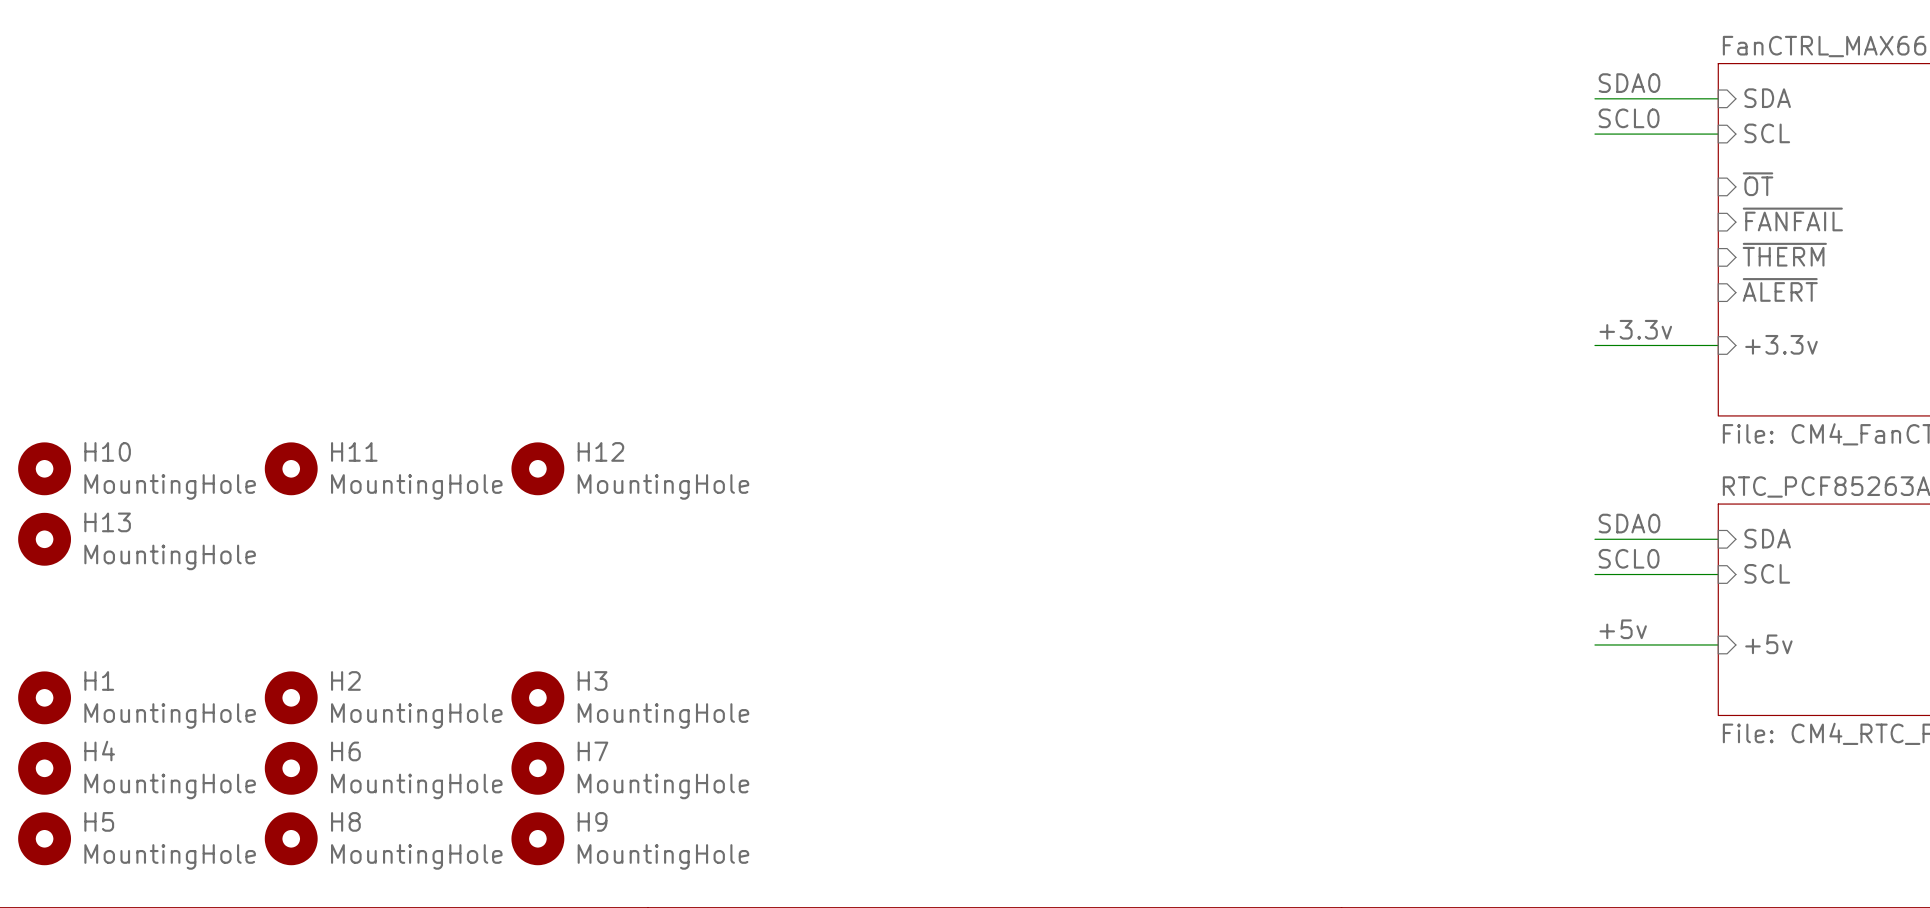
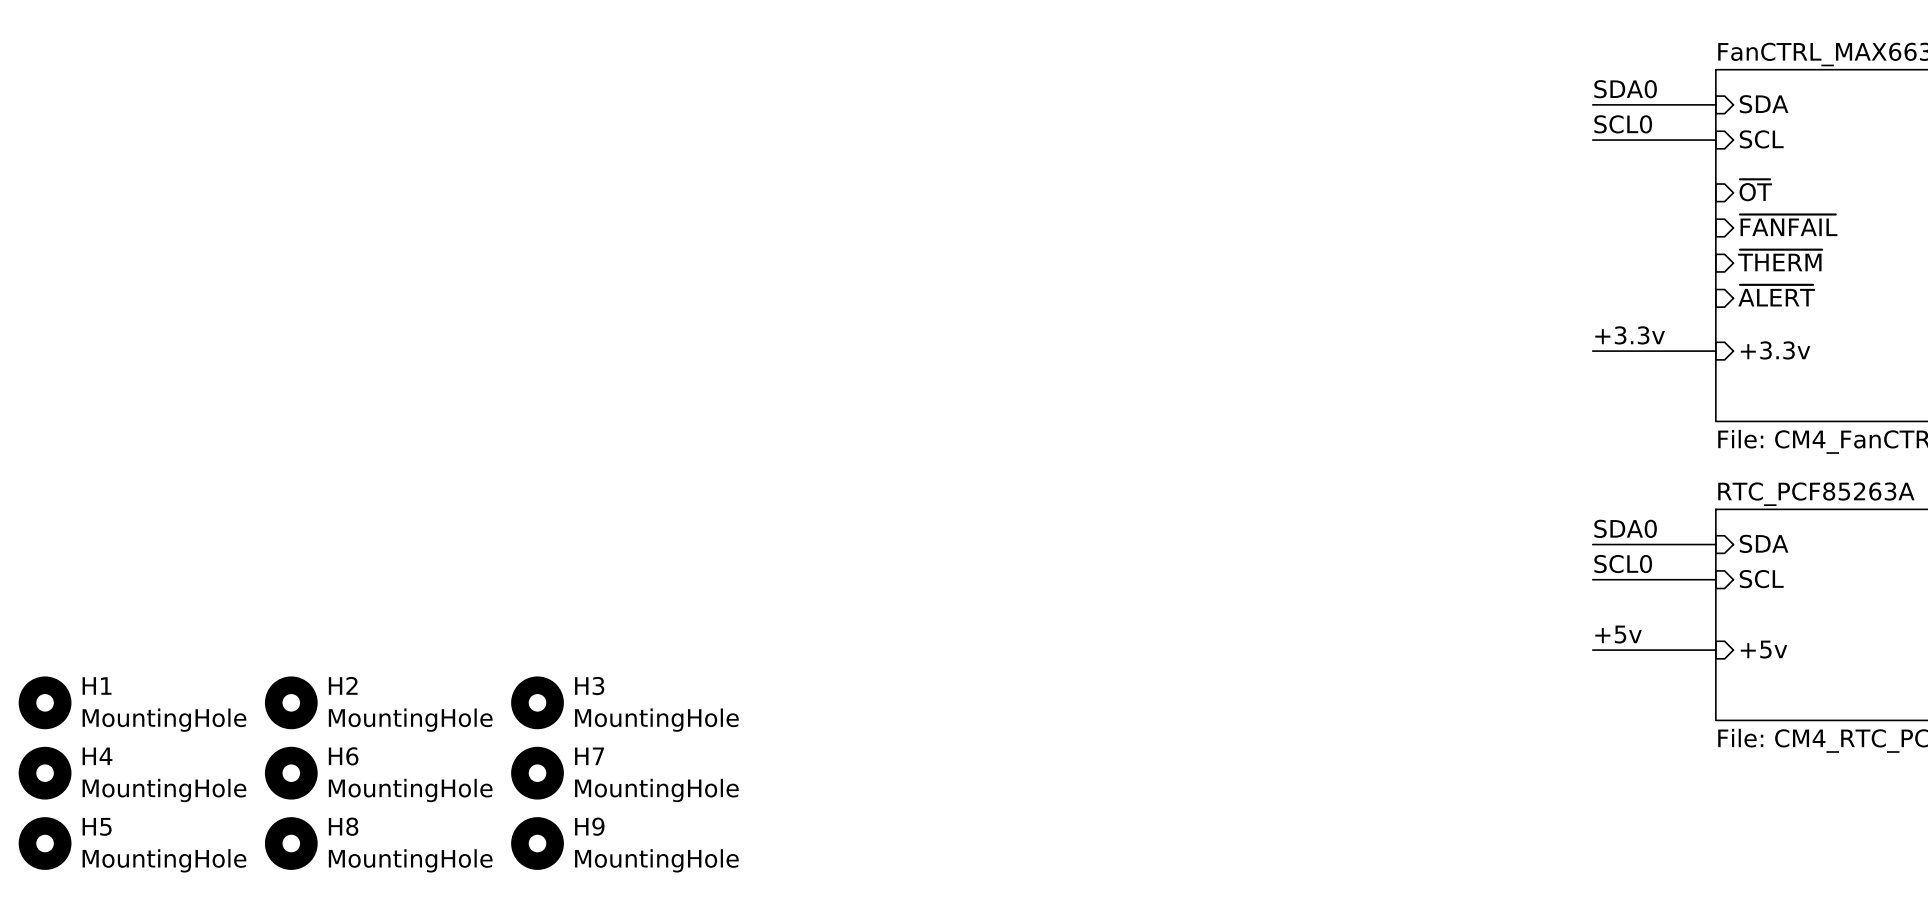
H10: MountingHole (44, 468) -> none
H11: MountingHole (291, 468) -> none
H12: MountingHole (537, 468) -> none
H13: MountingHole (44, 539) -> none

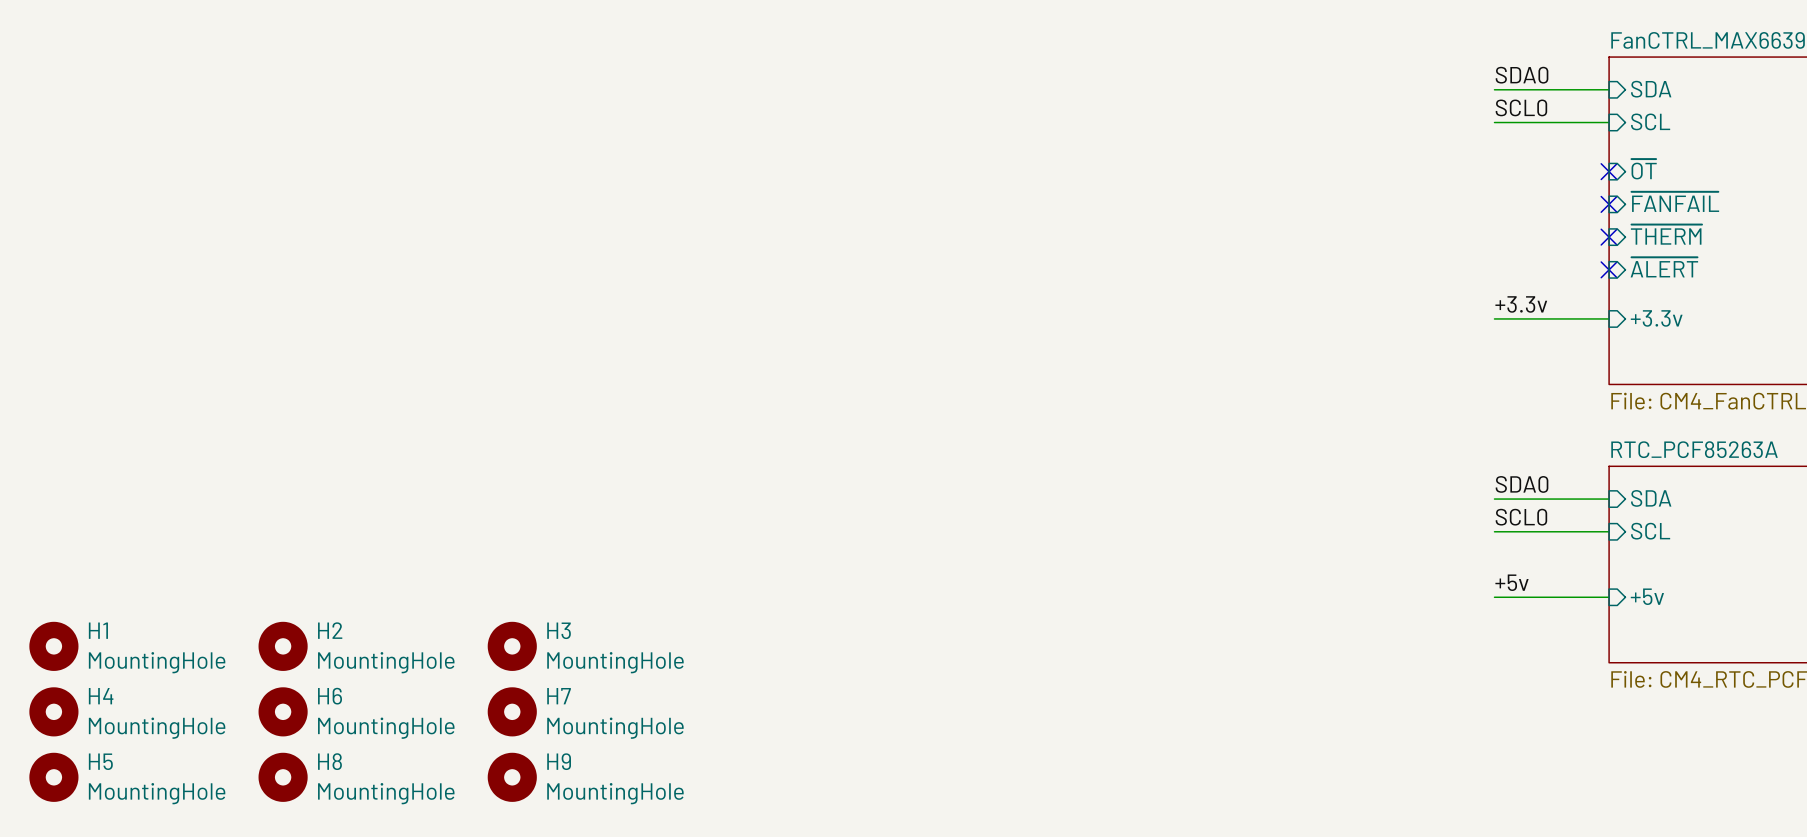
no-connect mark: none -> (1609, 171)
no-connect mark: none -> (1609, 204)
no-connect mark: none -> (1609, 237)
no-connect mark: none -> (1609, 269)

